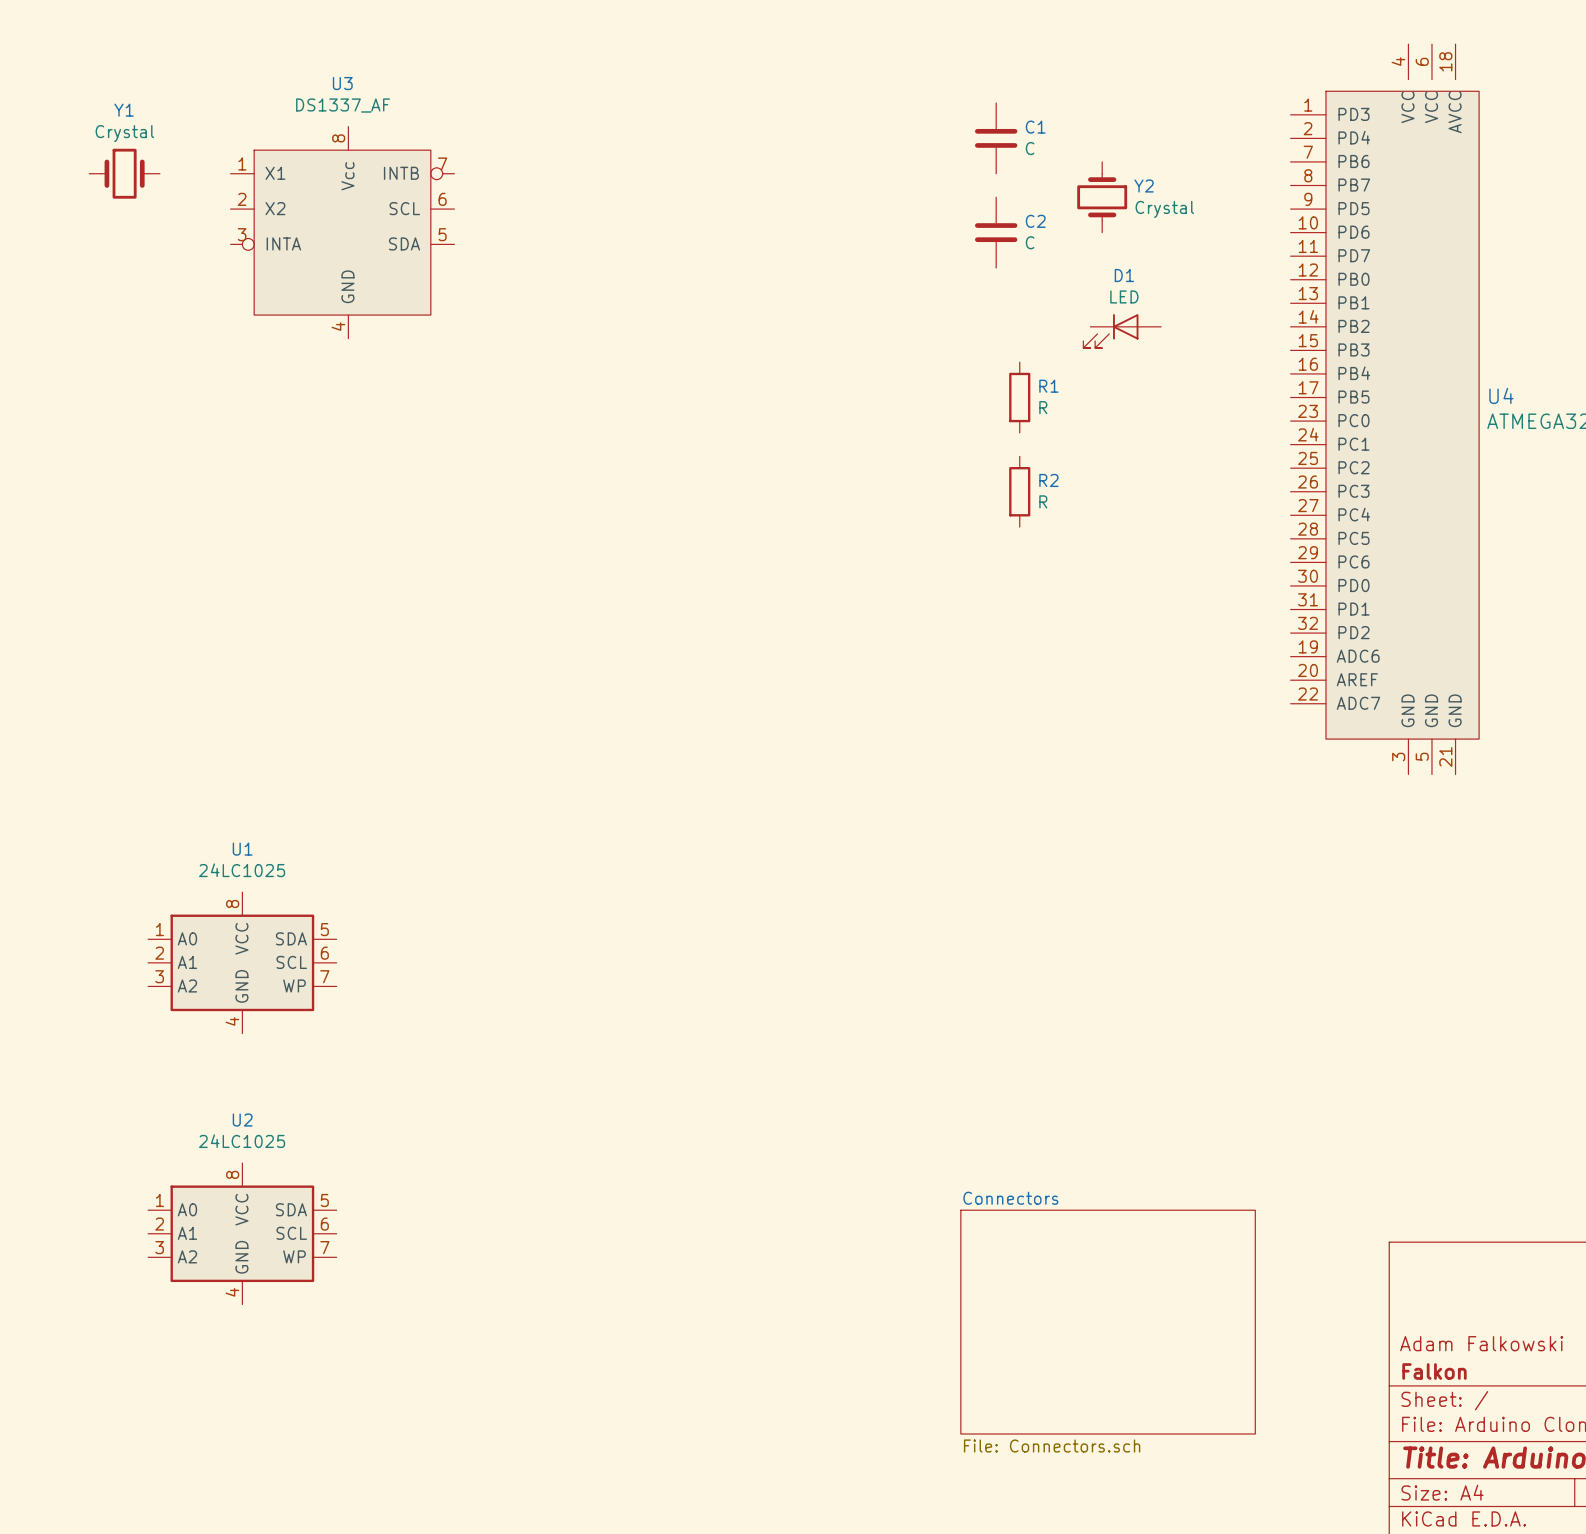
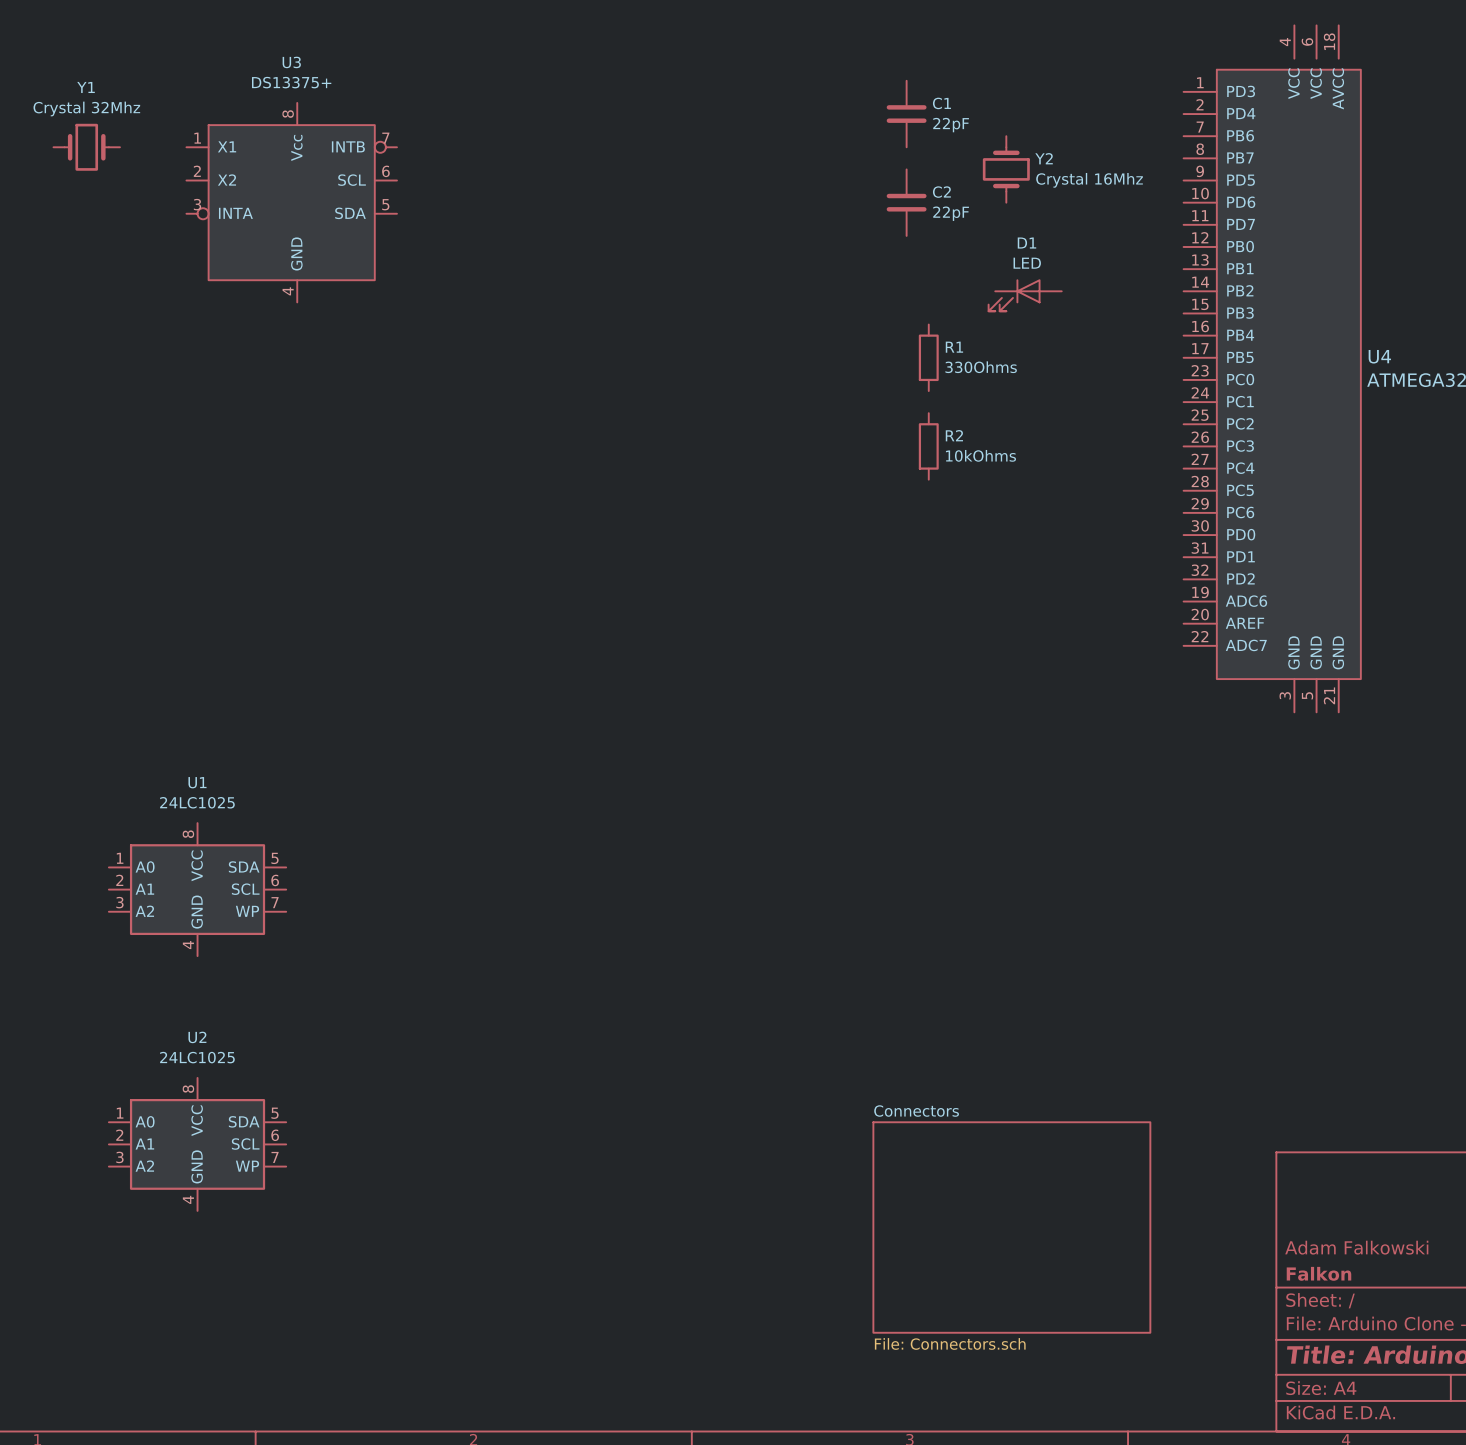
U3 value: DS1337_AF (343, 105) -> DS13375+ (291, 82)
Y1 value: Crystal (124, 133) -> Crystal 32Mhz (86, 108)
C1 value: C (1030, 148) -> 22pF (951, 125)
Y2 value: Crystal (1164, 209) -> Crystal 16Mhz (1089, 180)
C2 value: C (1030, 242) -> 22pF (951, 213)
R1 value: R (1043, 407) -> 330Ohms (981, 367)
R2 value: R (1043, 501) -> 10kOhms (980, 455)

